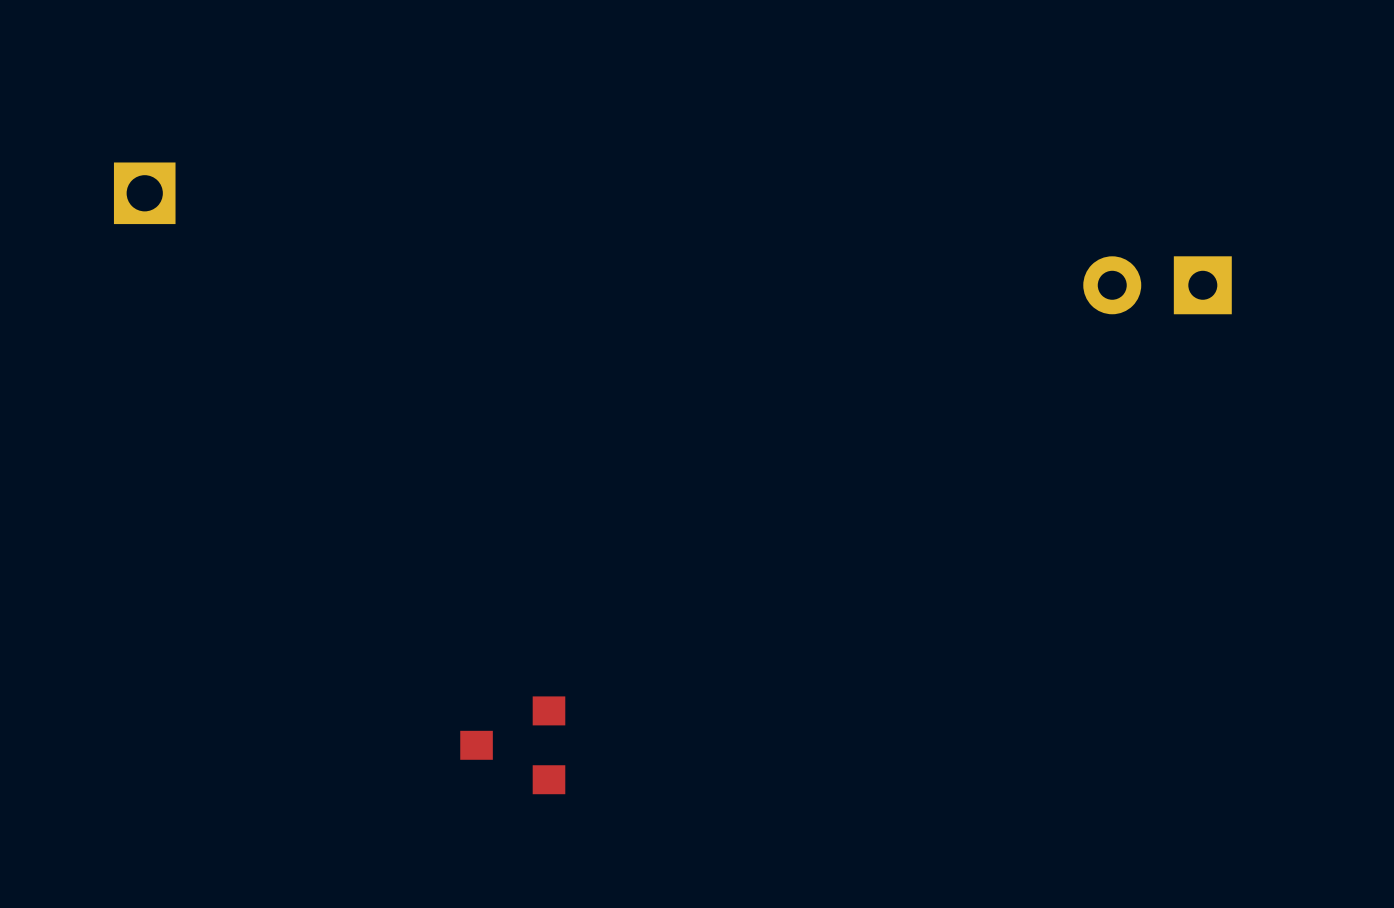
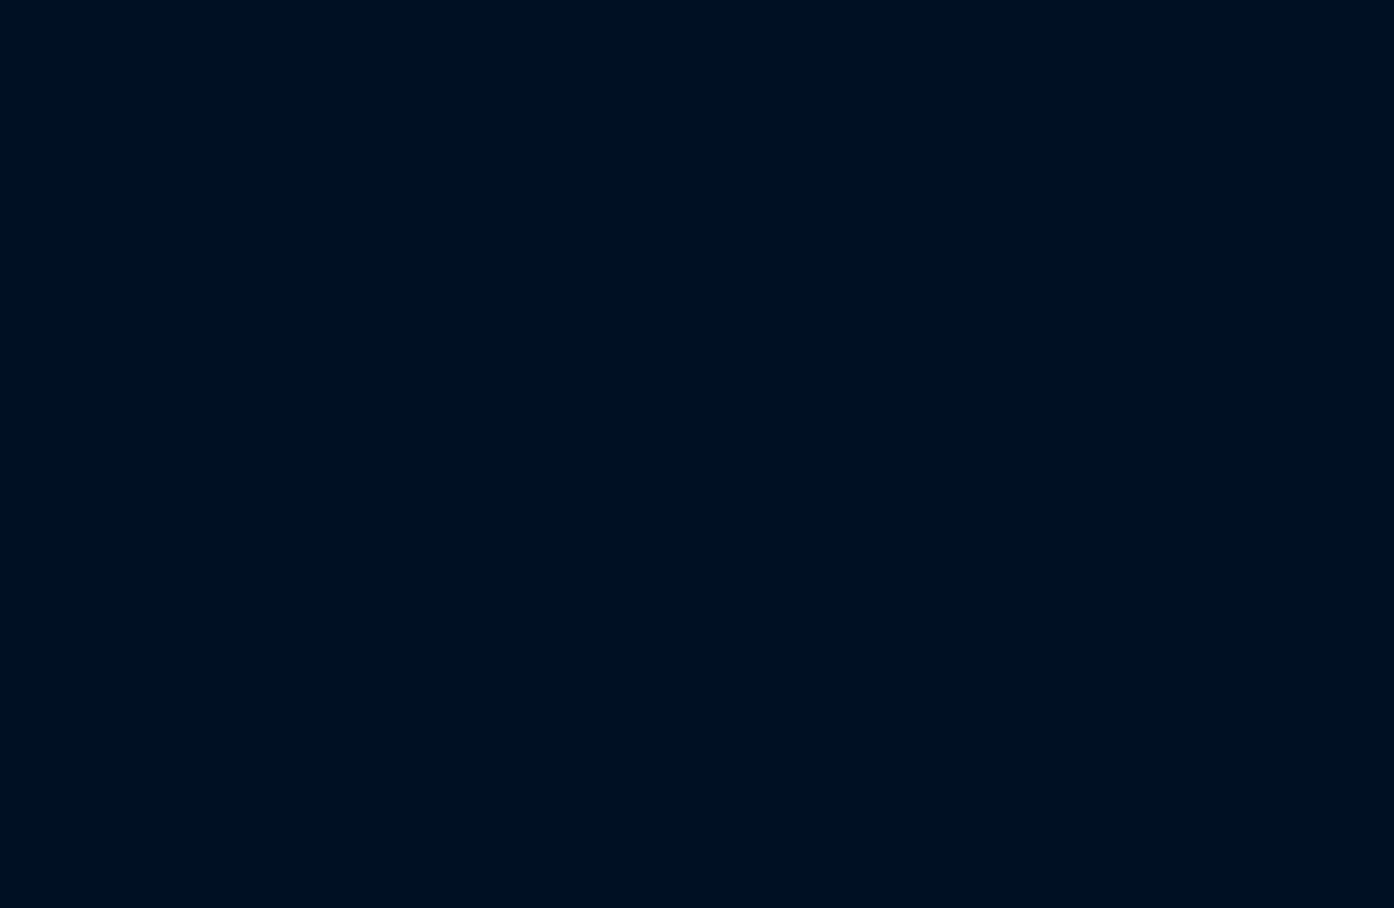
part: (144, 193) -> none
part: (1157, 285) -> none
part: (512, 745) -> none

